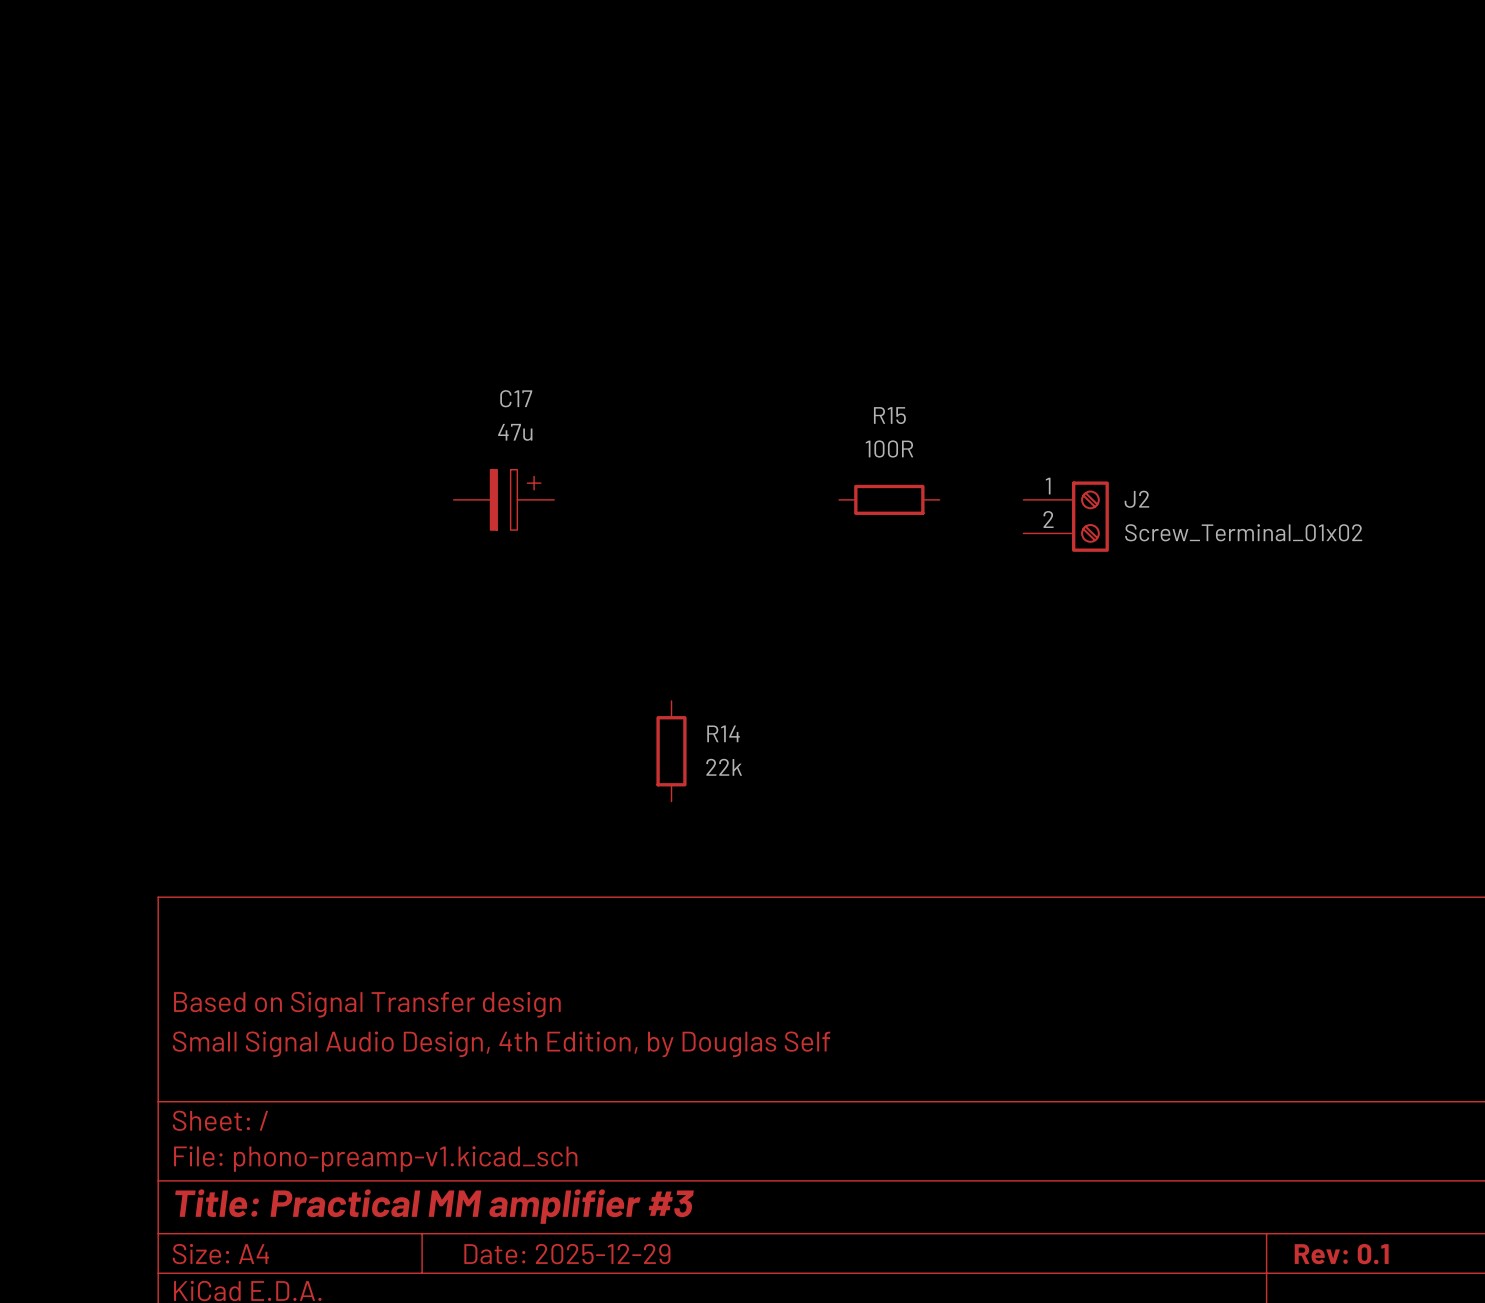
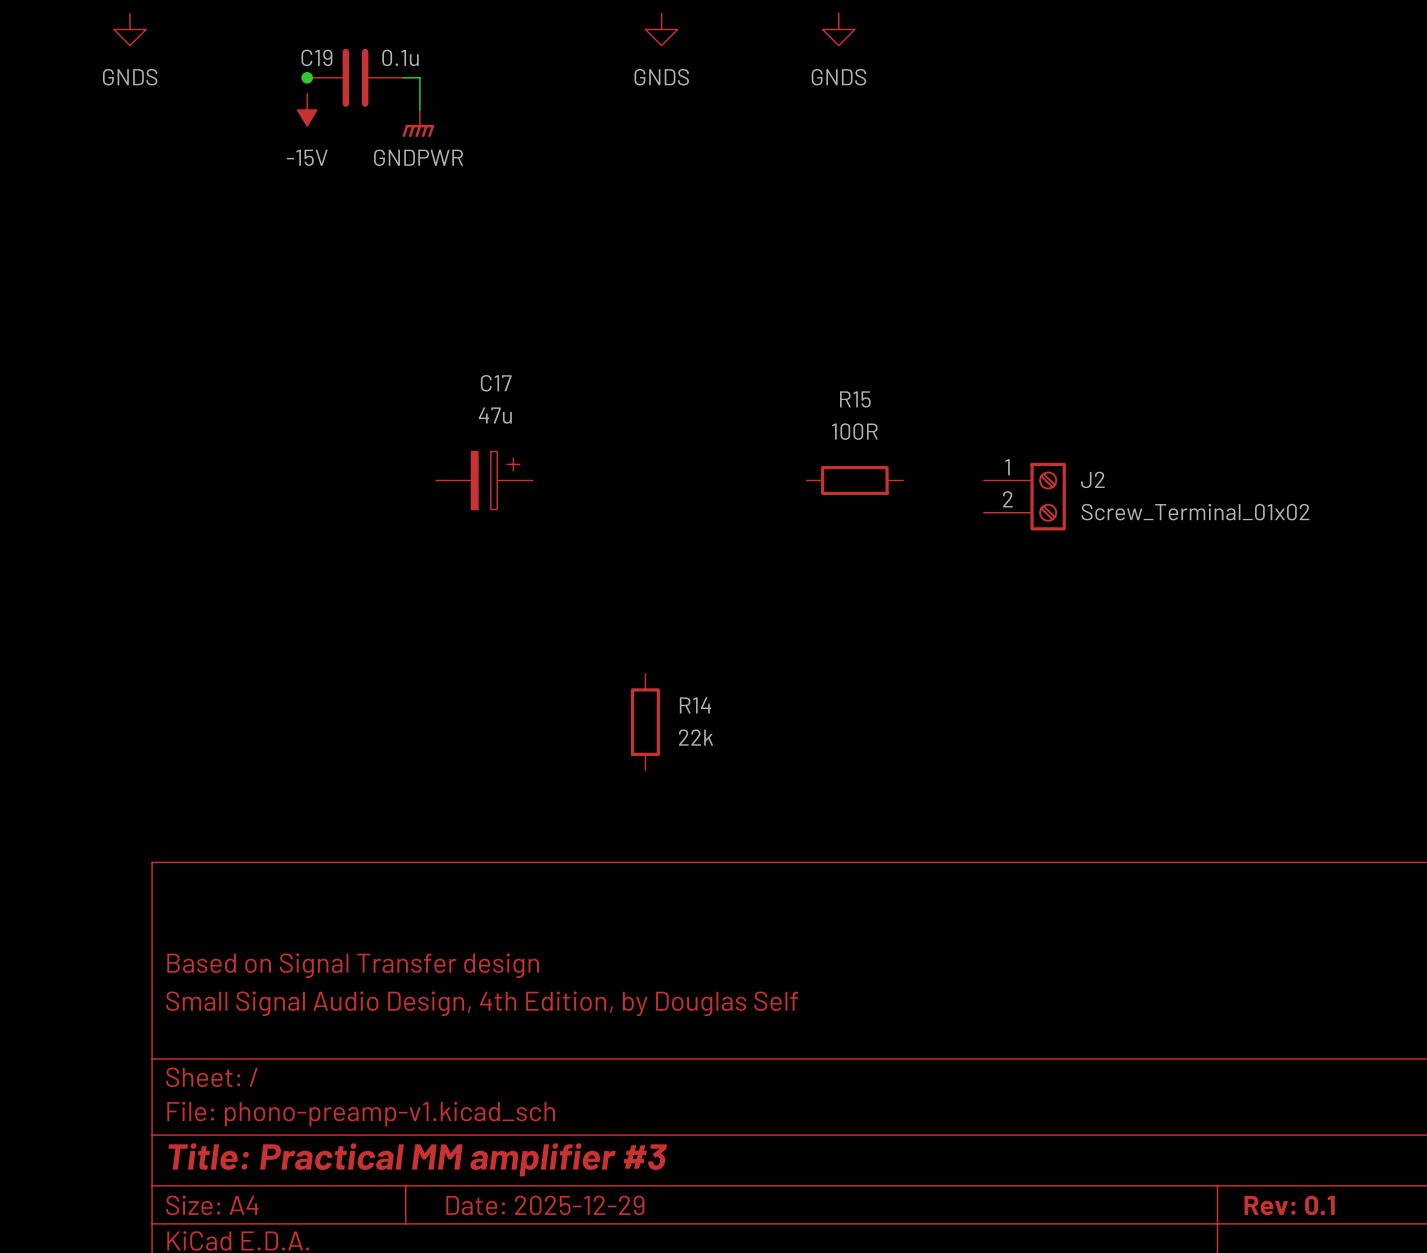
power symbol: none -> GNDS (130, 29)
power symbol: none -> GNDS (661, 29)
power symbol: none -> GNDS (838, 29)
junction: none -> (307, 77)
C19: none -> 0.1u (355, 77)
wire: none -> (403, 77) (419, 77) (419, 110)
power symbol: none -> -15V (307, 110)
power symbol: none -> GNDPWR (418, 123)

